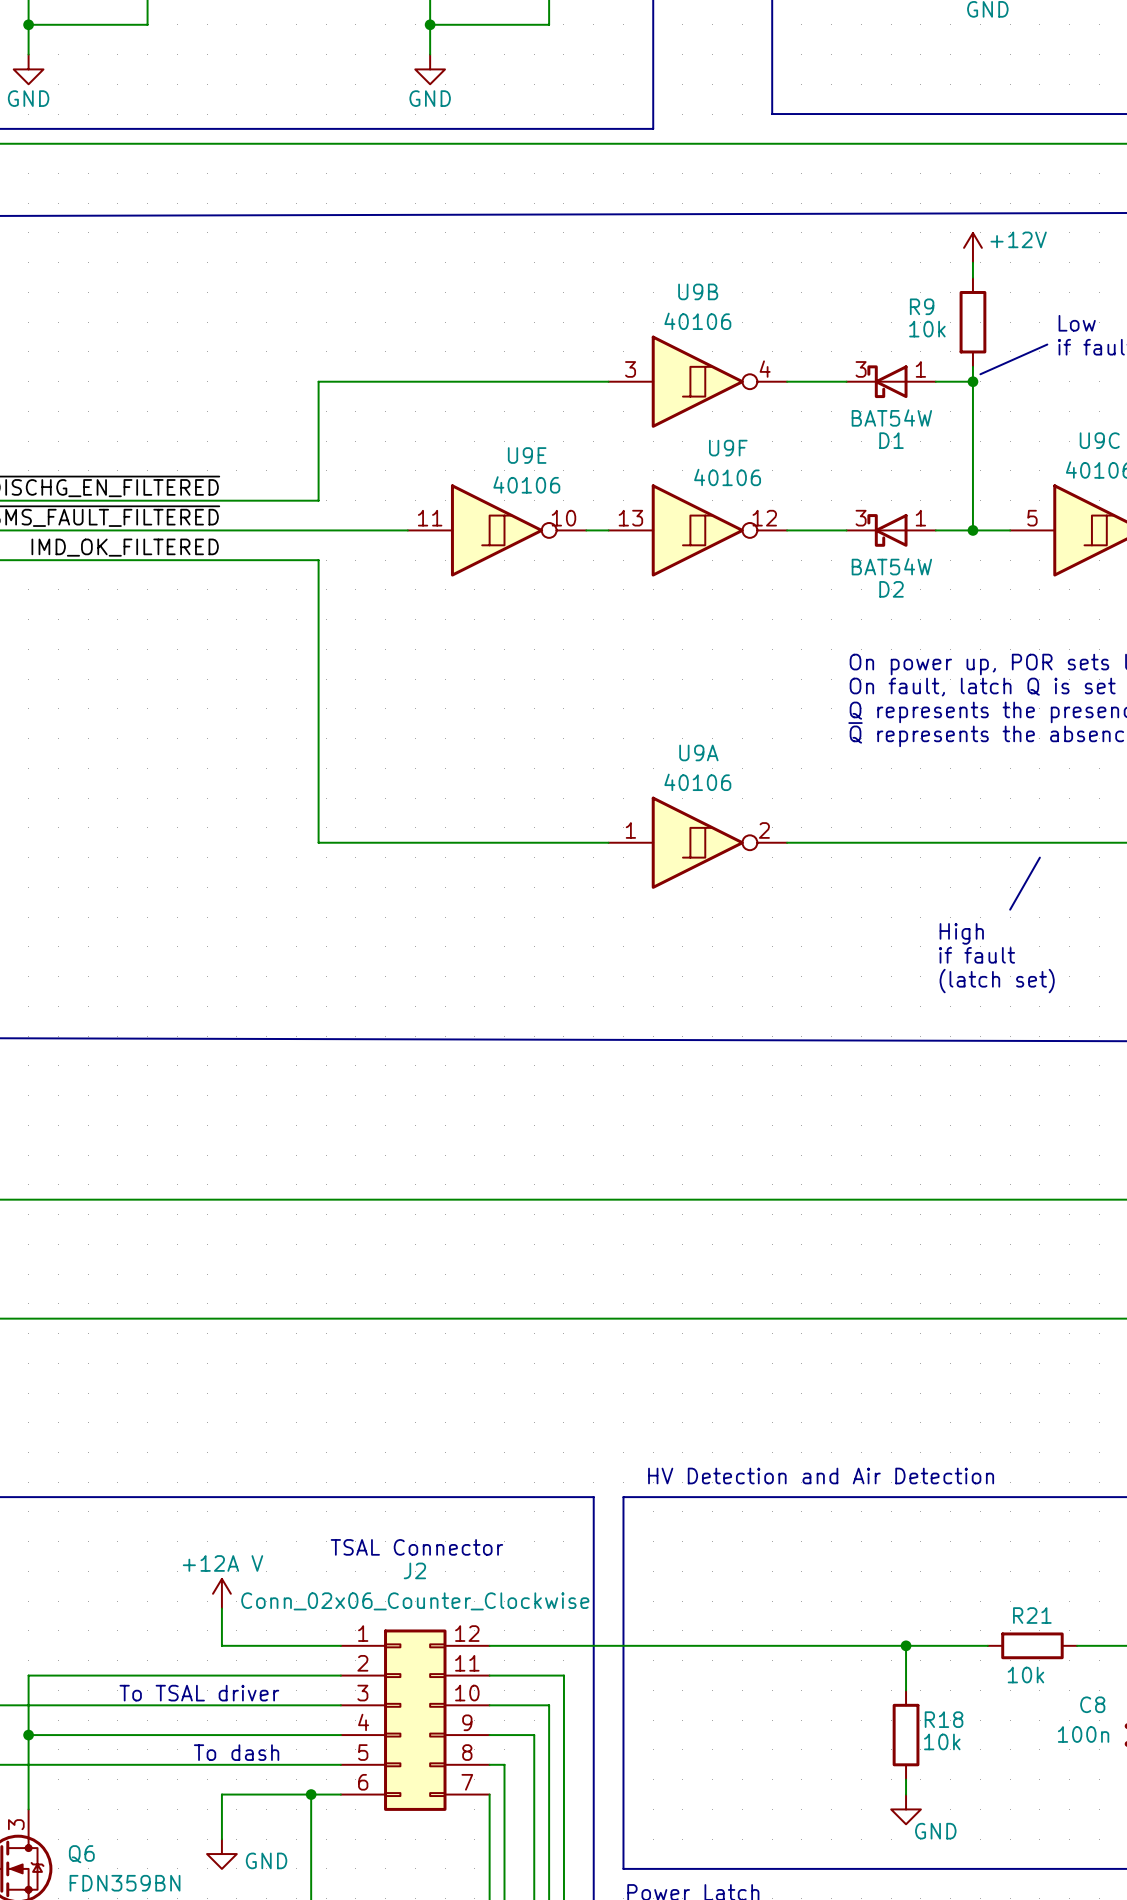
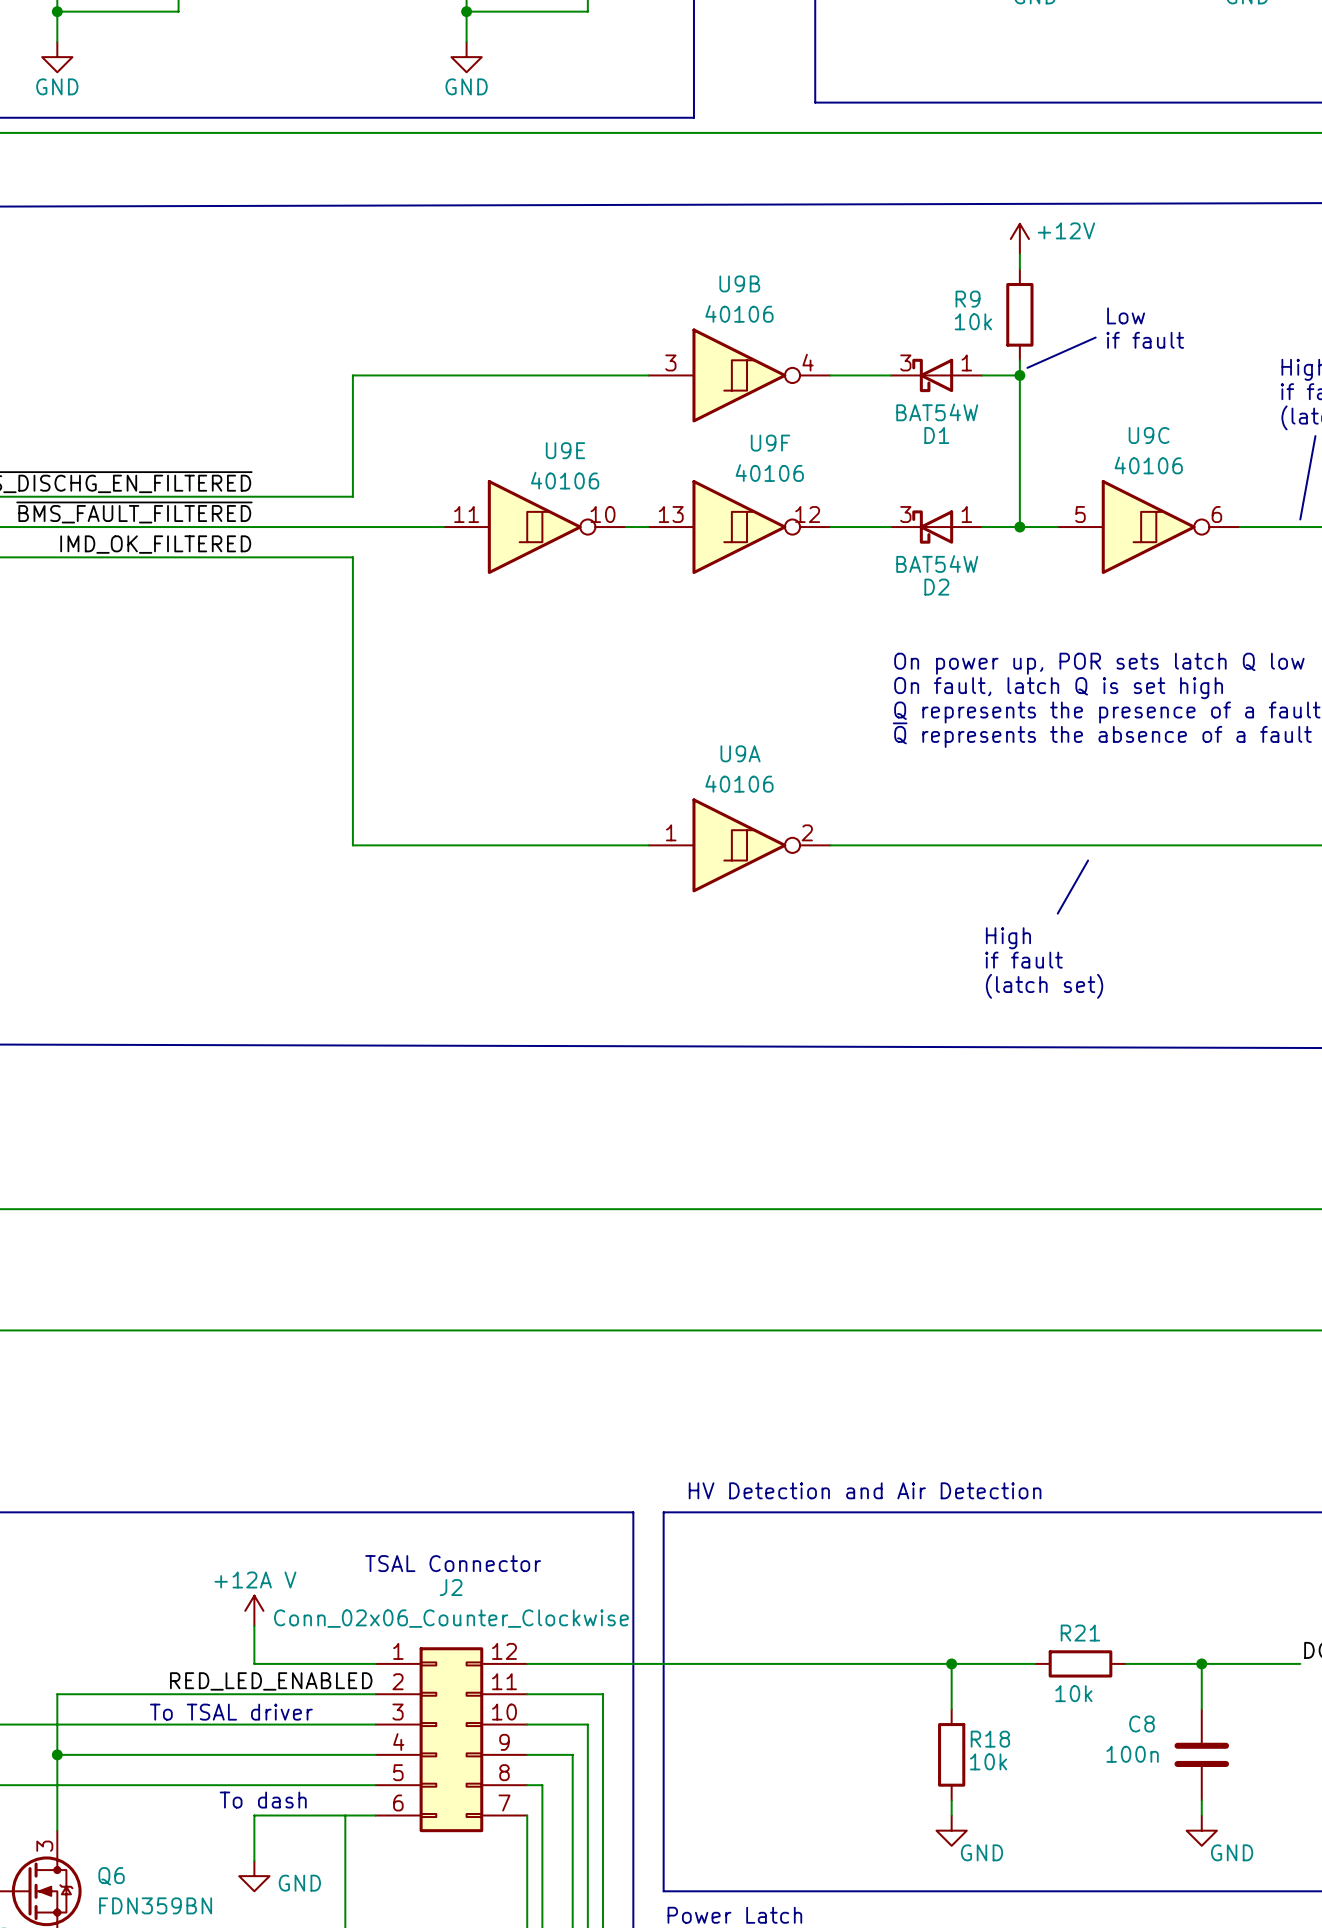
label: none -> RED_LED_ENABLED (271, 1681)
text position: To dash (236, 1752) -> To dash (263, 1800)
junction: (311, 1794) -> none

